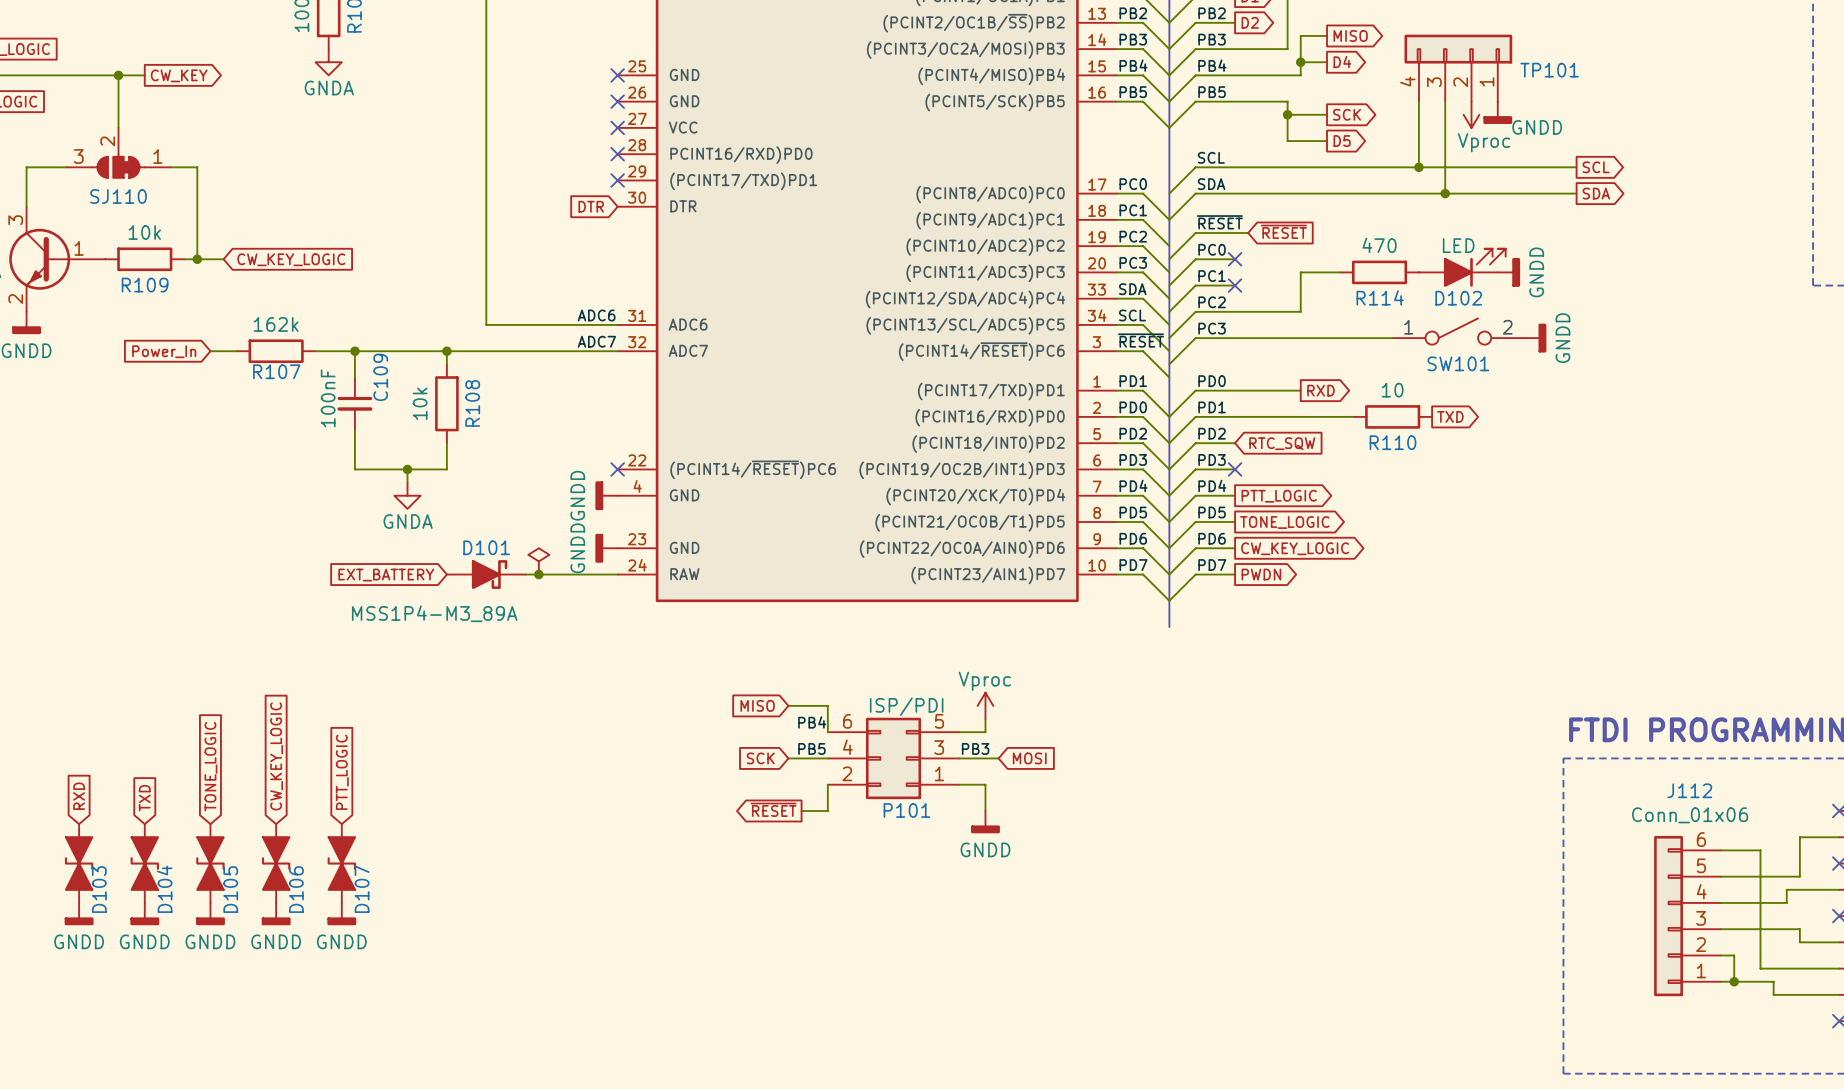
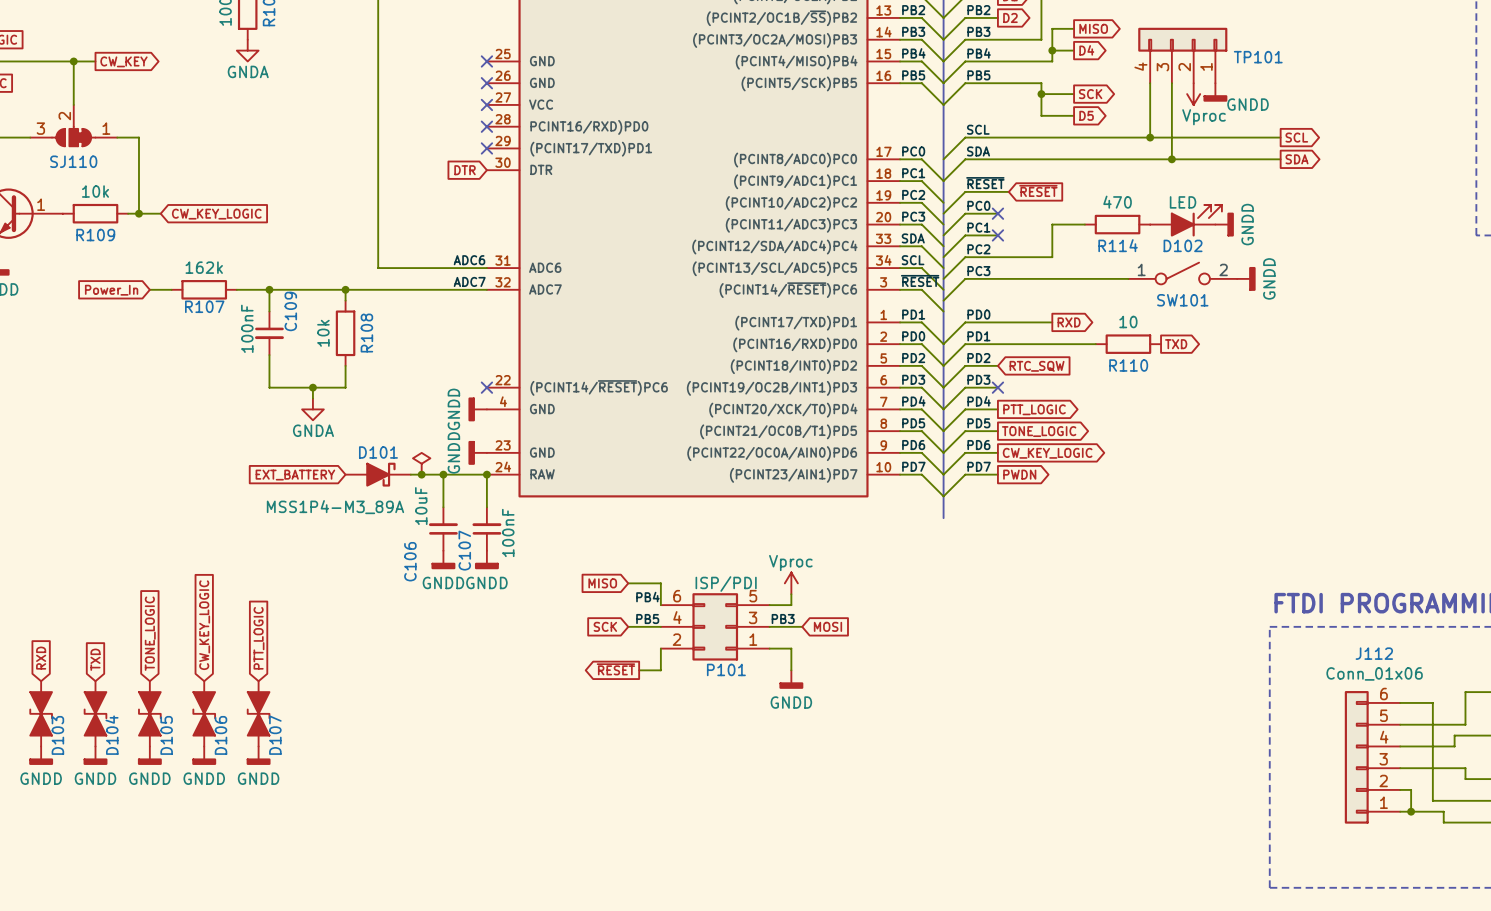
wire: none -> (443, 474) (443, 507)
junction: none -> (443, 474)
wire: none -> (486, 474) (486, 507)
junction: none -> (486, 474)
C106: none -> 10uF (443, 529)
C107: none -> 100nF (486, 529)
power symbol: none -> GNDD (443, 559)
power symbol: none -> GNDD (486, 559)

